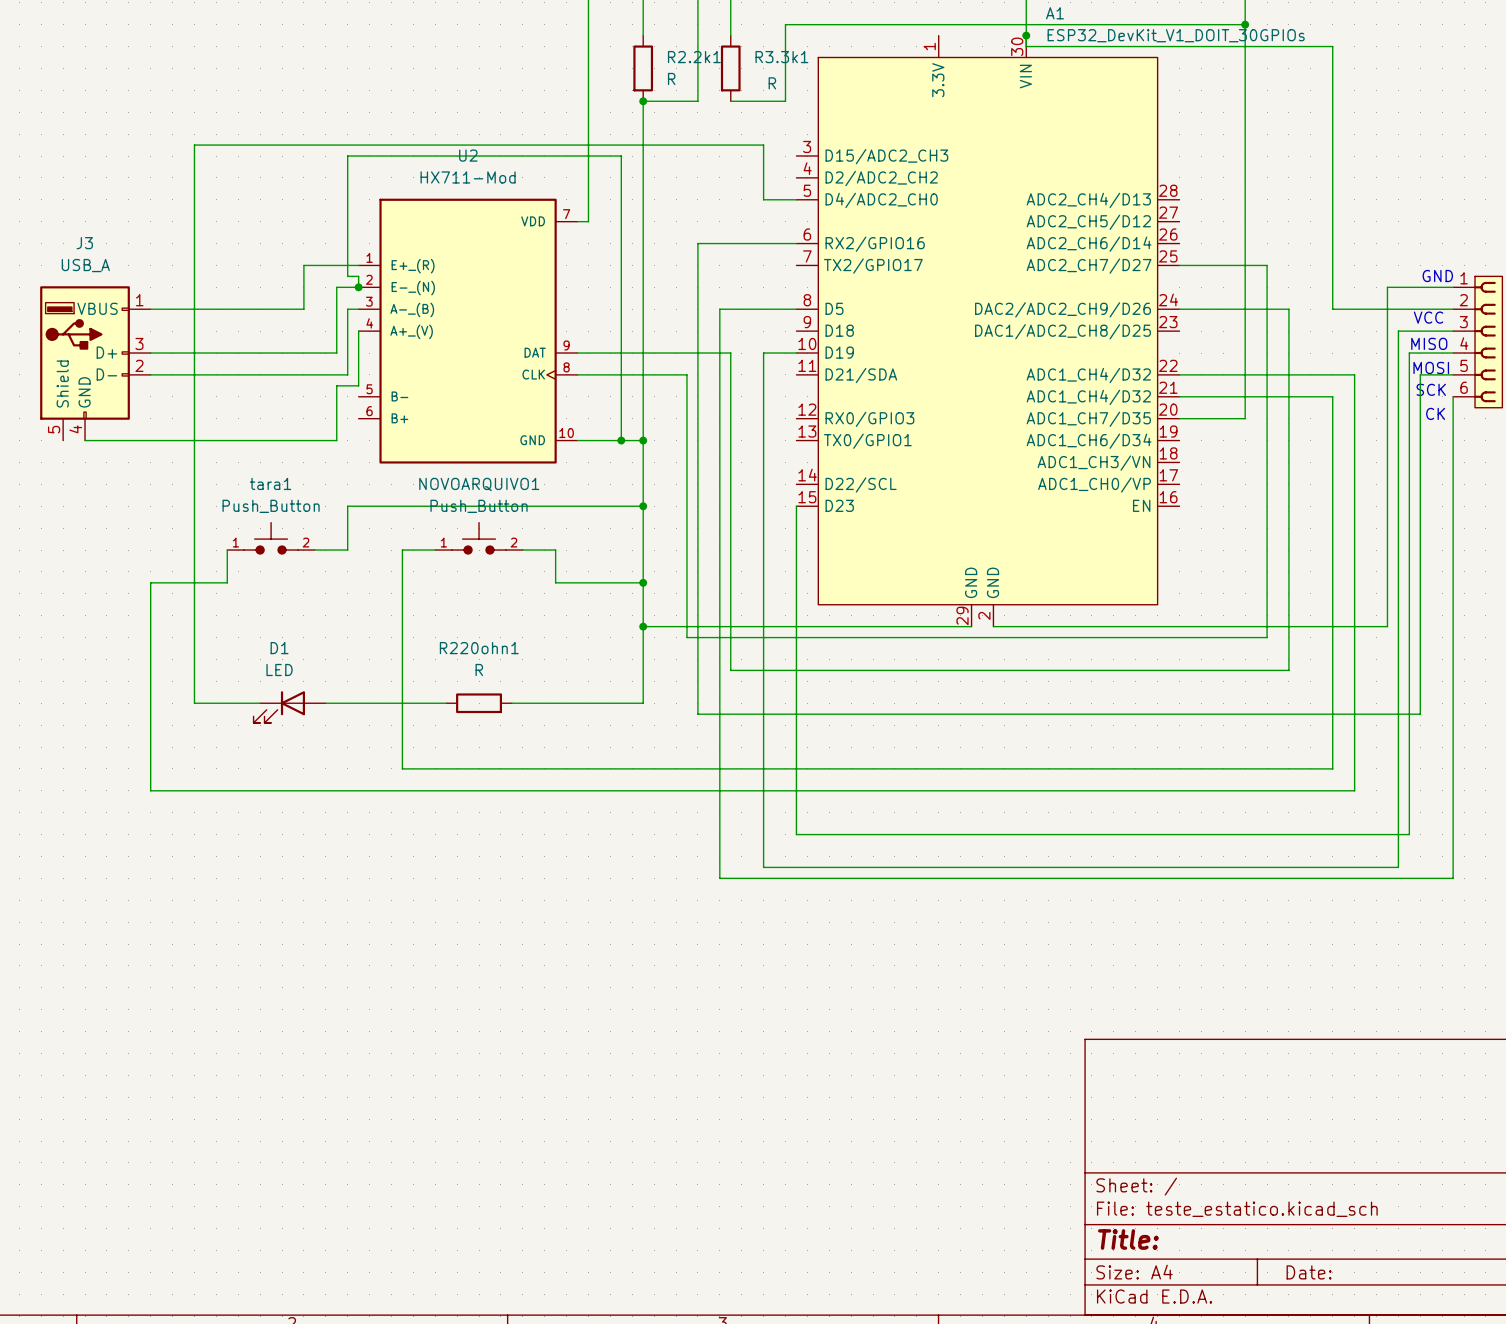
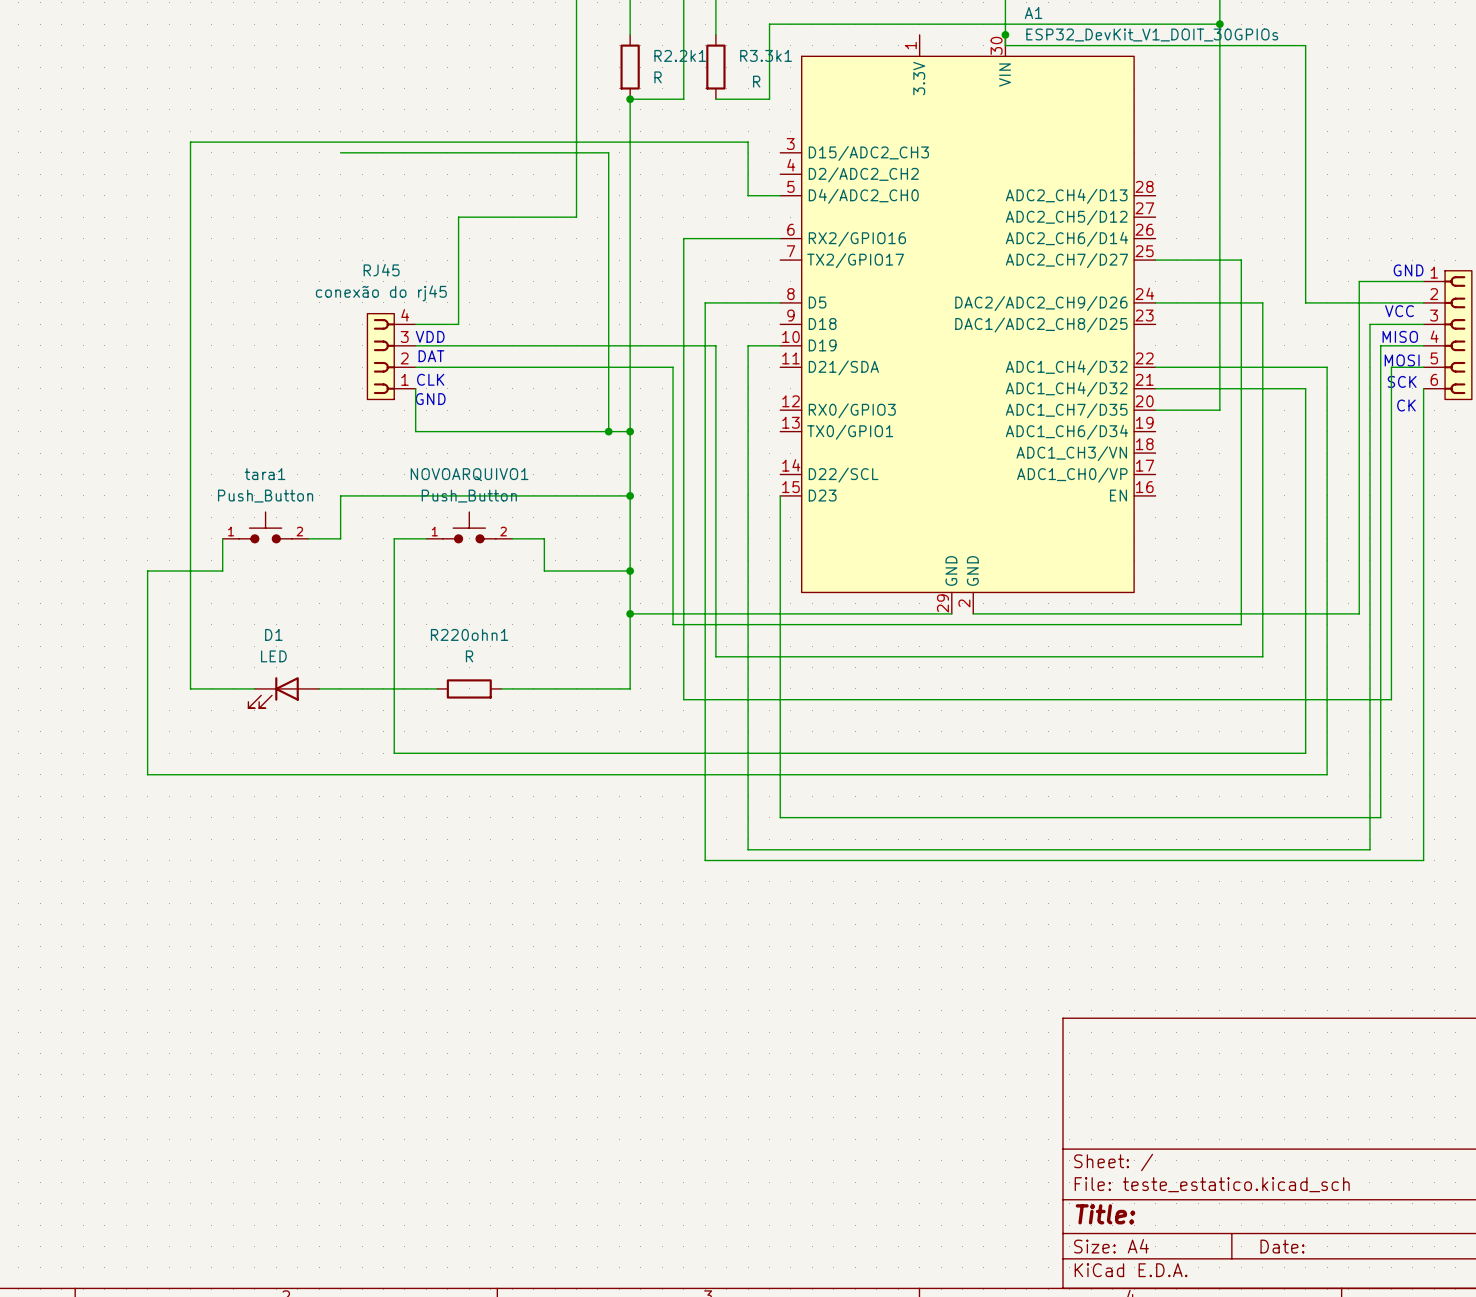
wire: (347, 156) (347, 276) (358, 276) (358, 287) (336, 287) (336, 353) (150, 353) -> none
wire: (358, 265) (303, 265) (303, 309) (150, 309) -> none
junction: (358, 287) -> none
wire: (358, 309) (347, 309) (347, 374) (150, 374) -> none
wire: (358, 331) (358, 385) (336, 385) (336, 440) (85, 440) -> none
U2: HX711-Mod (468, 331) -> none
text: none -> VDD (430, 336)
J3: USB_A (95, 363) -> none
RJ45: none -> conexão do rj45 (391, 356)
text: none -> DAT (431, 356)
text: none -> CLK (430, 379)
text: none -> GND (430, 399)

